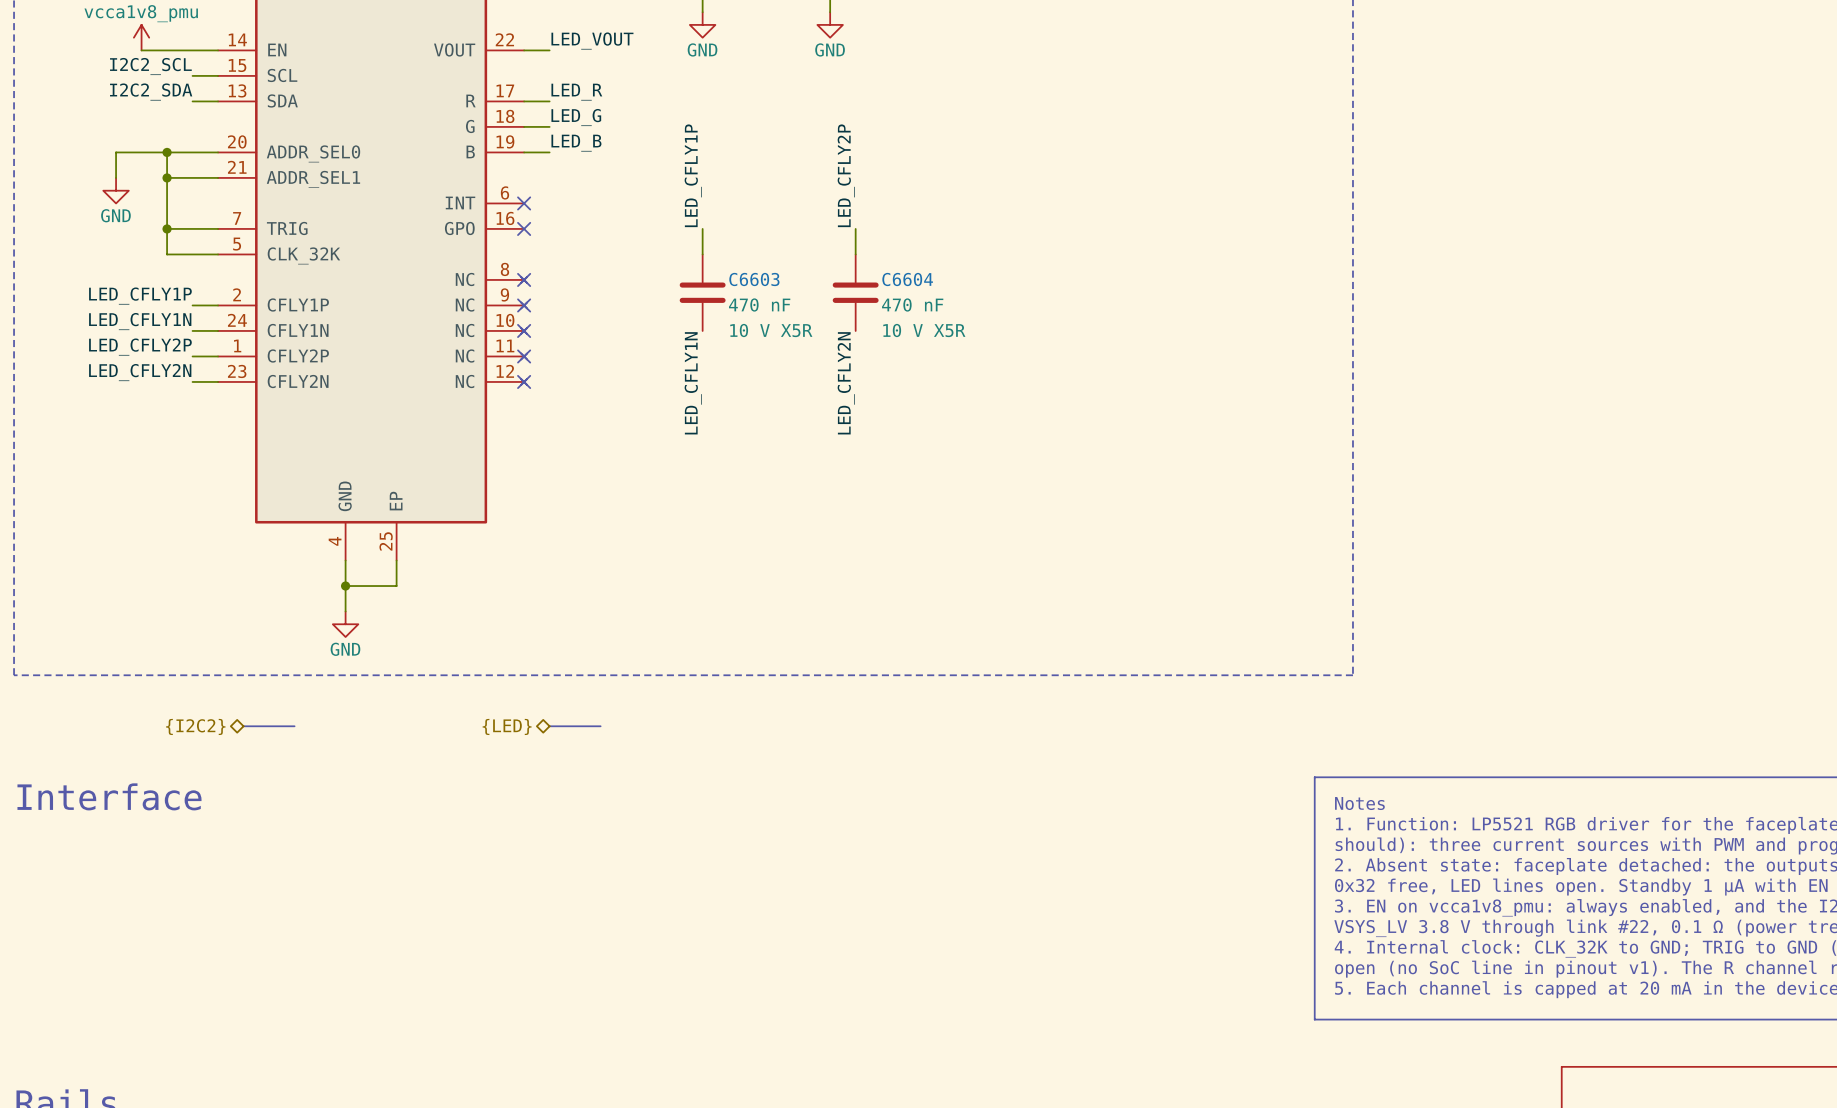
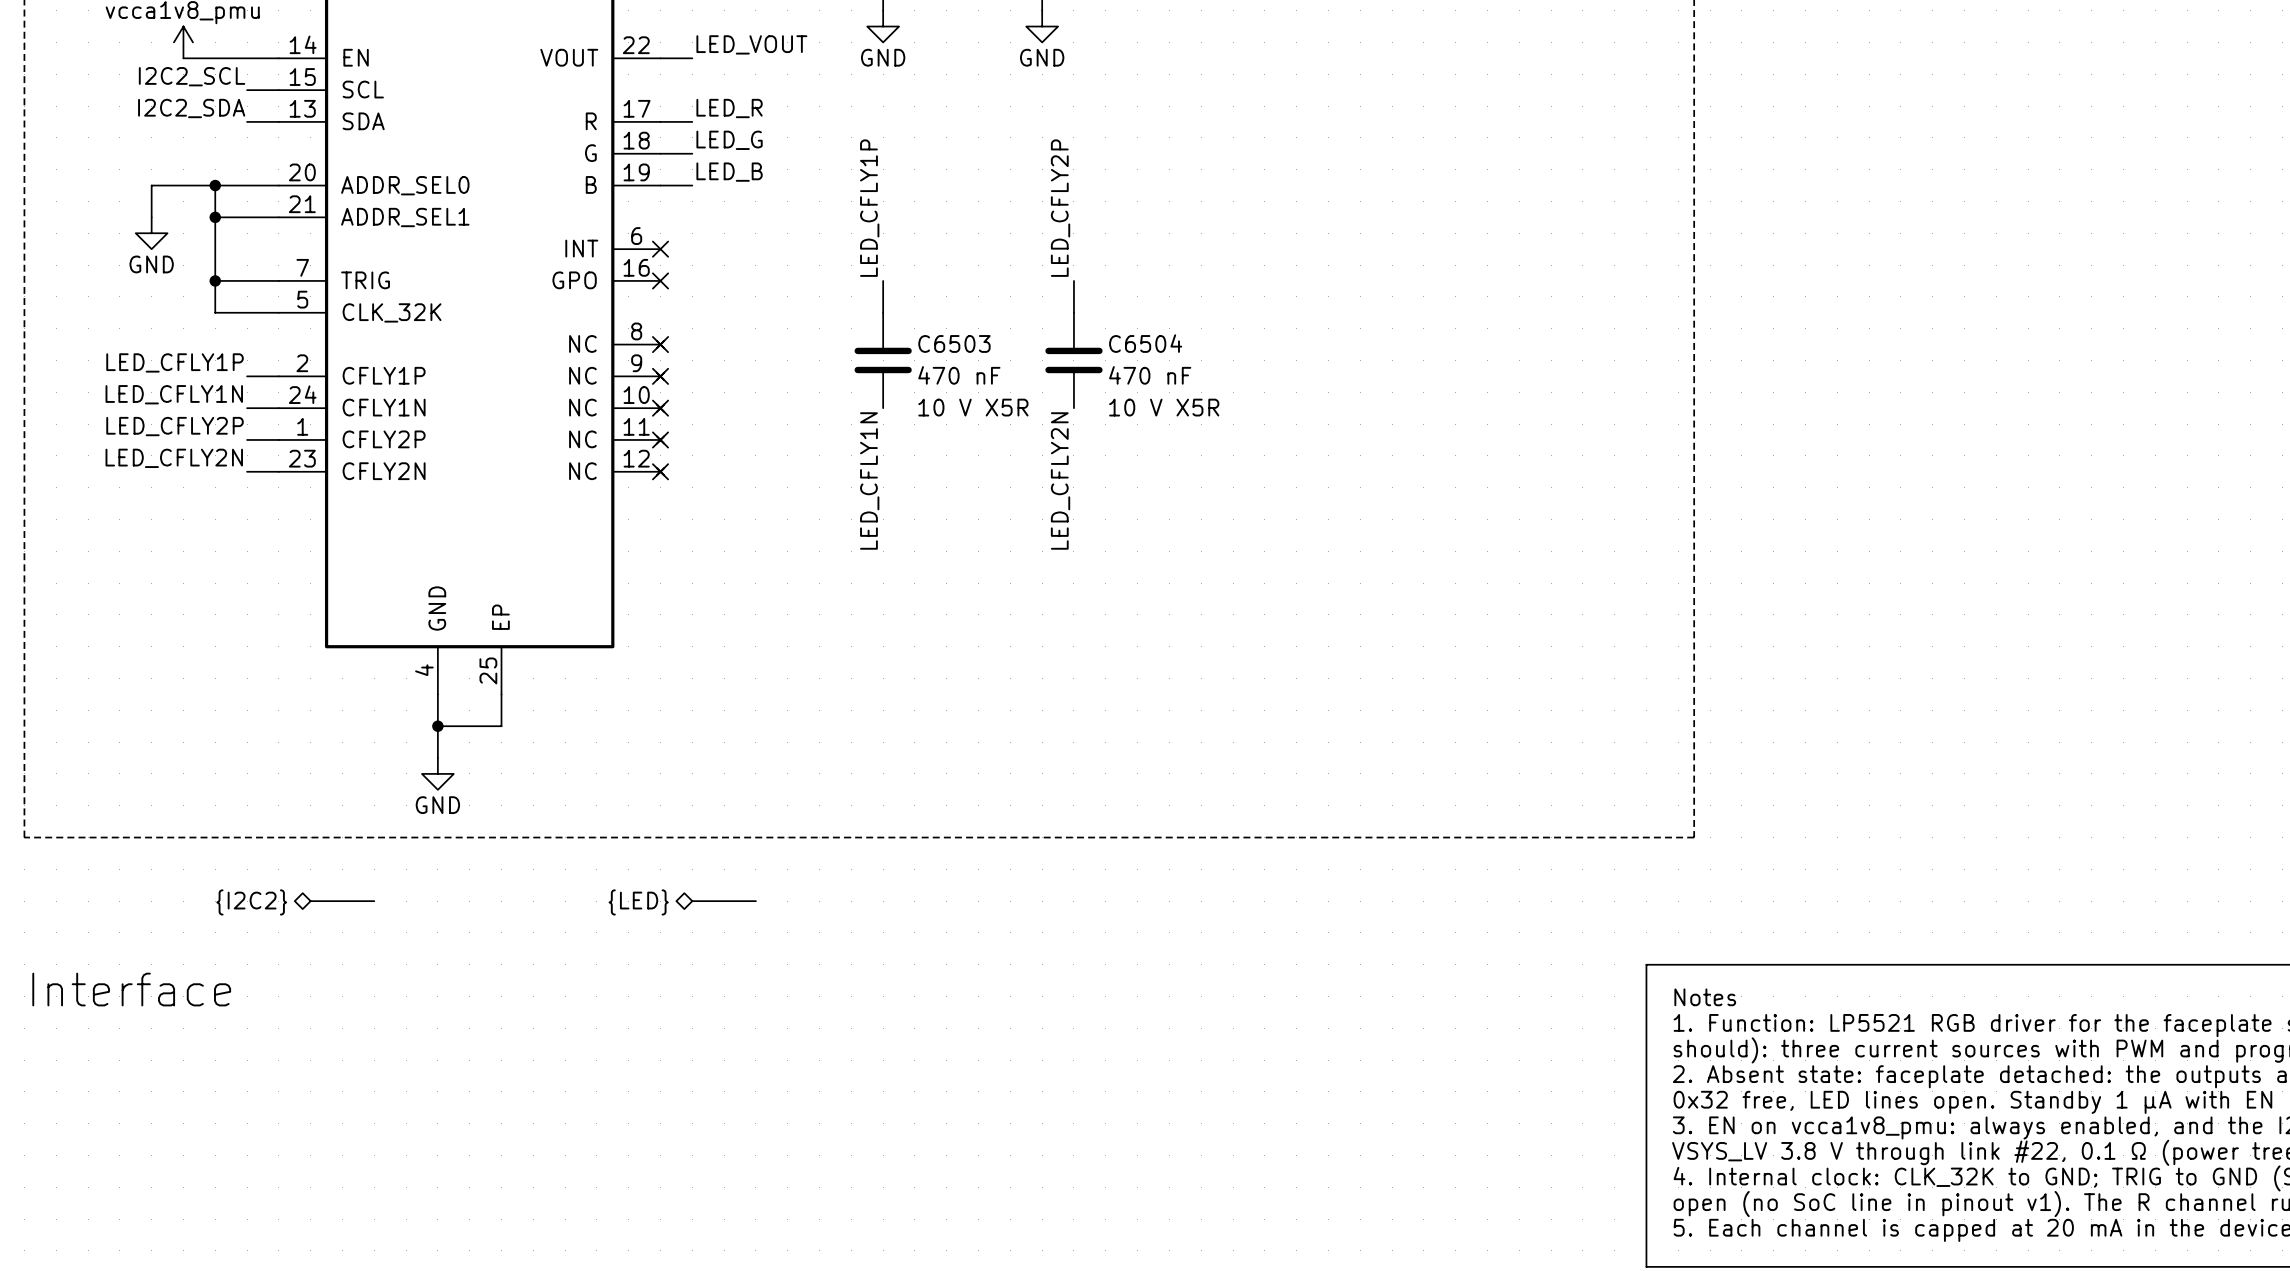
C6603 name: C6603 (754, 279) -> C6503 (954, 343)
C6604 name: C6604 (907, 279) -> C6504 (1145, 343)

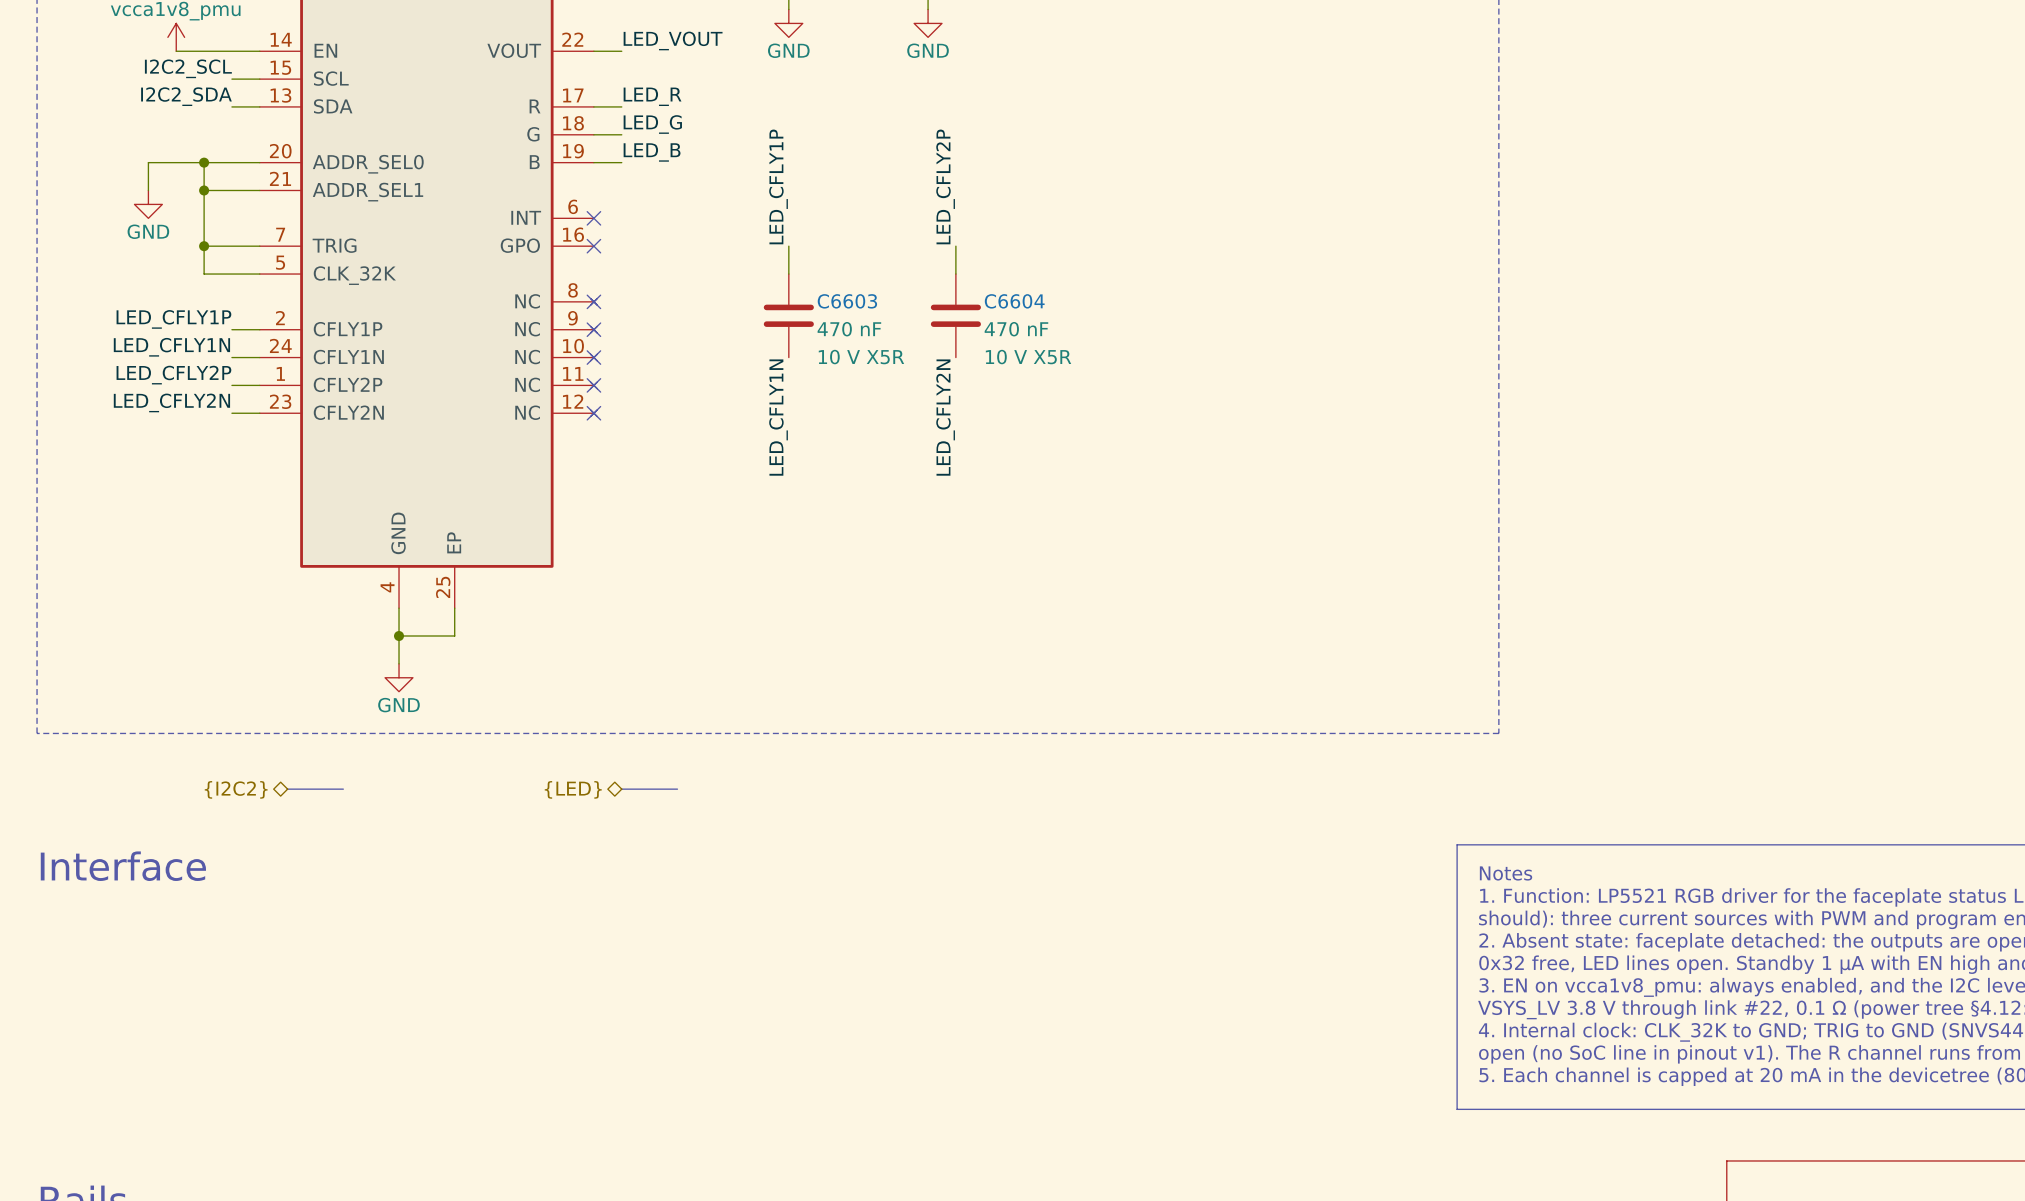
C6503 name: C6503 (954, 343) -> C6603 (847, 301)
C6504 name: C6504 (1145, 343) -> C6604 (1014, 301)

